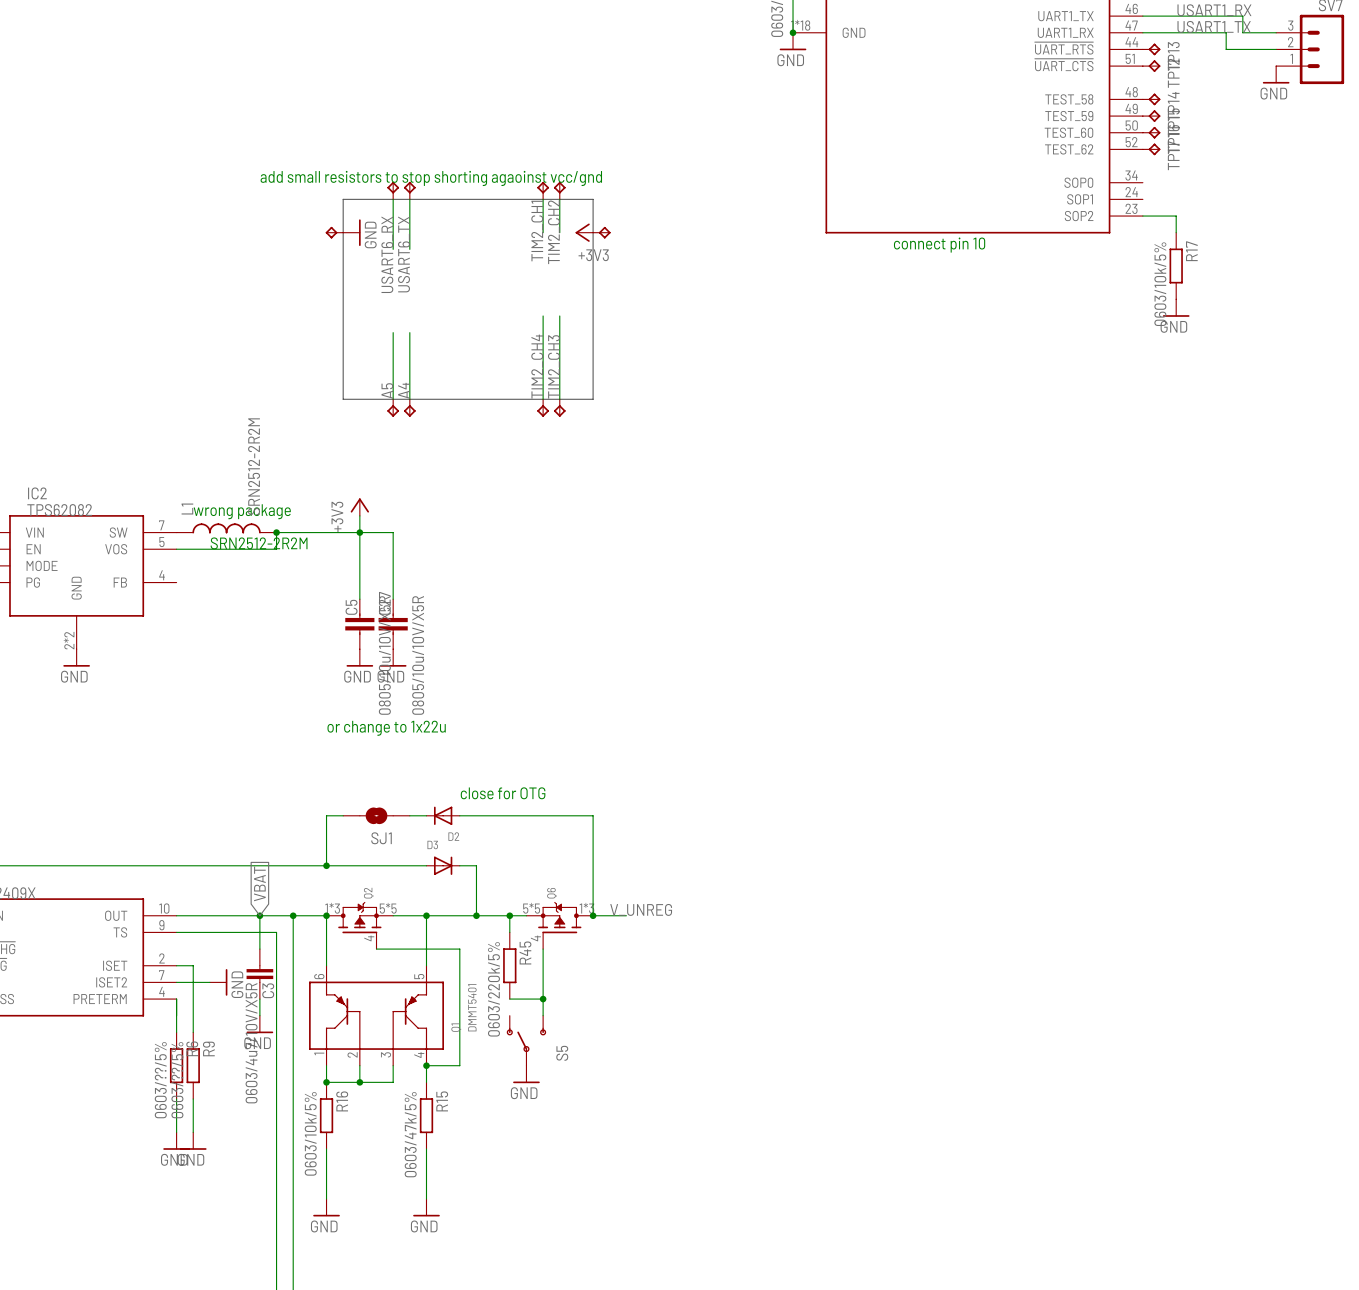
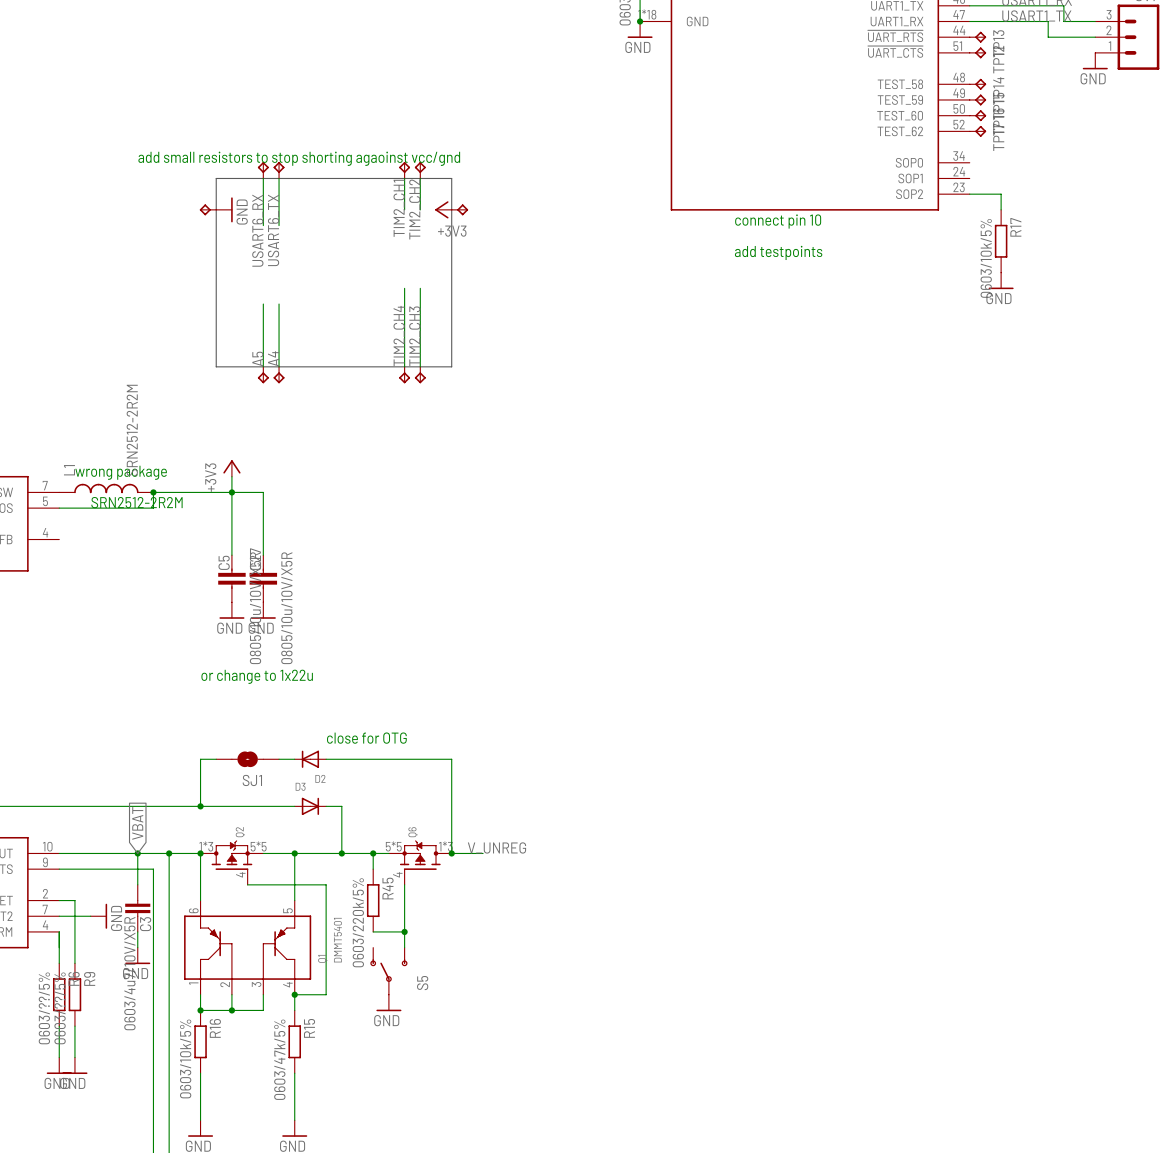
text: none -> add testpoints (778, 252)

